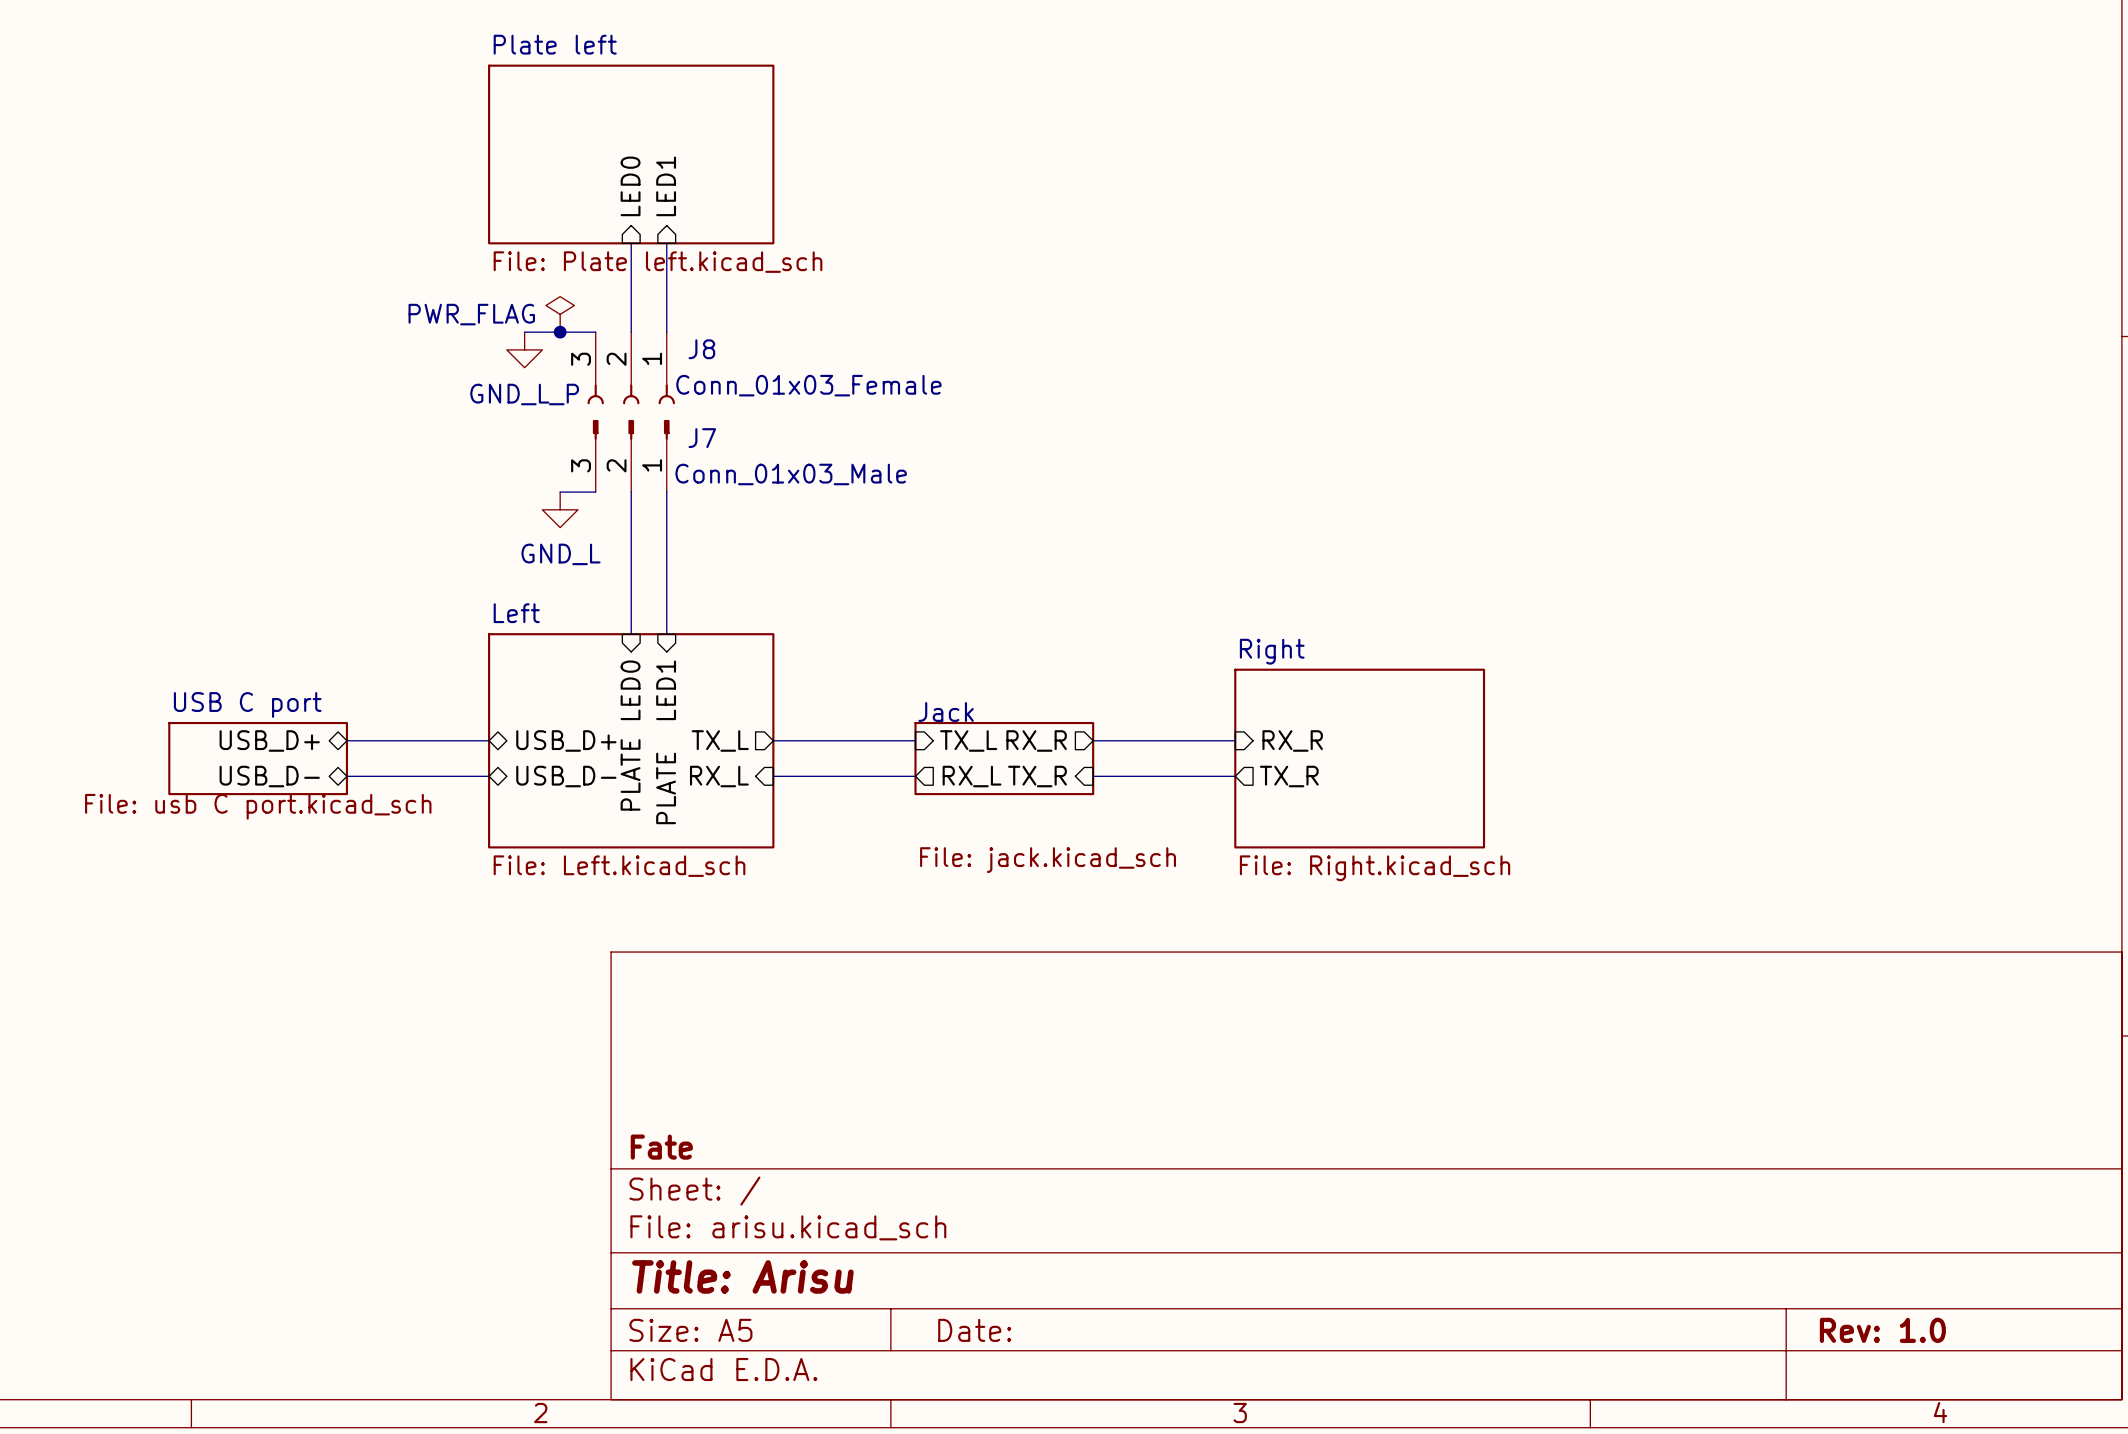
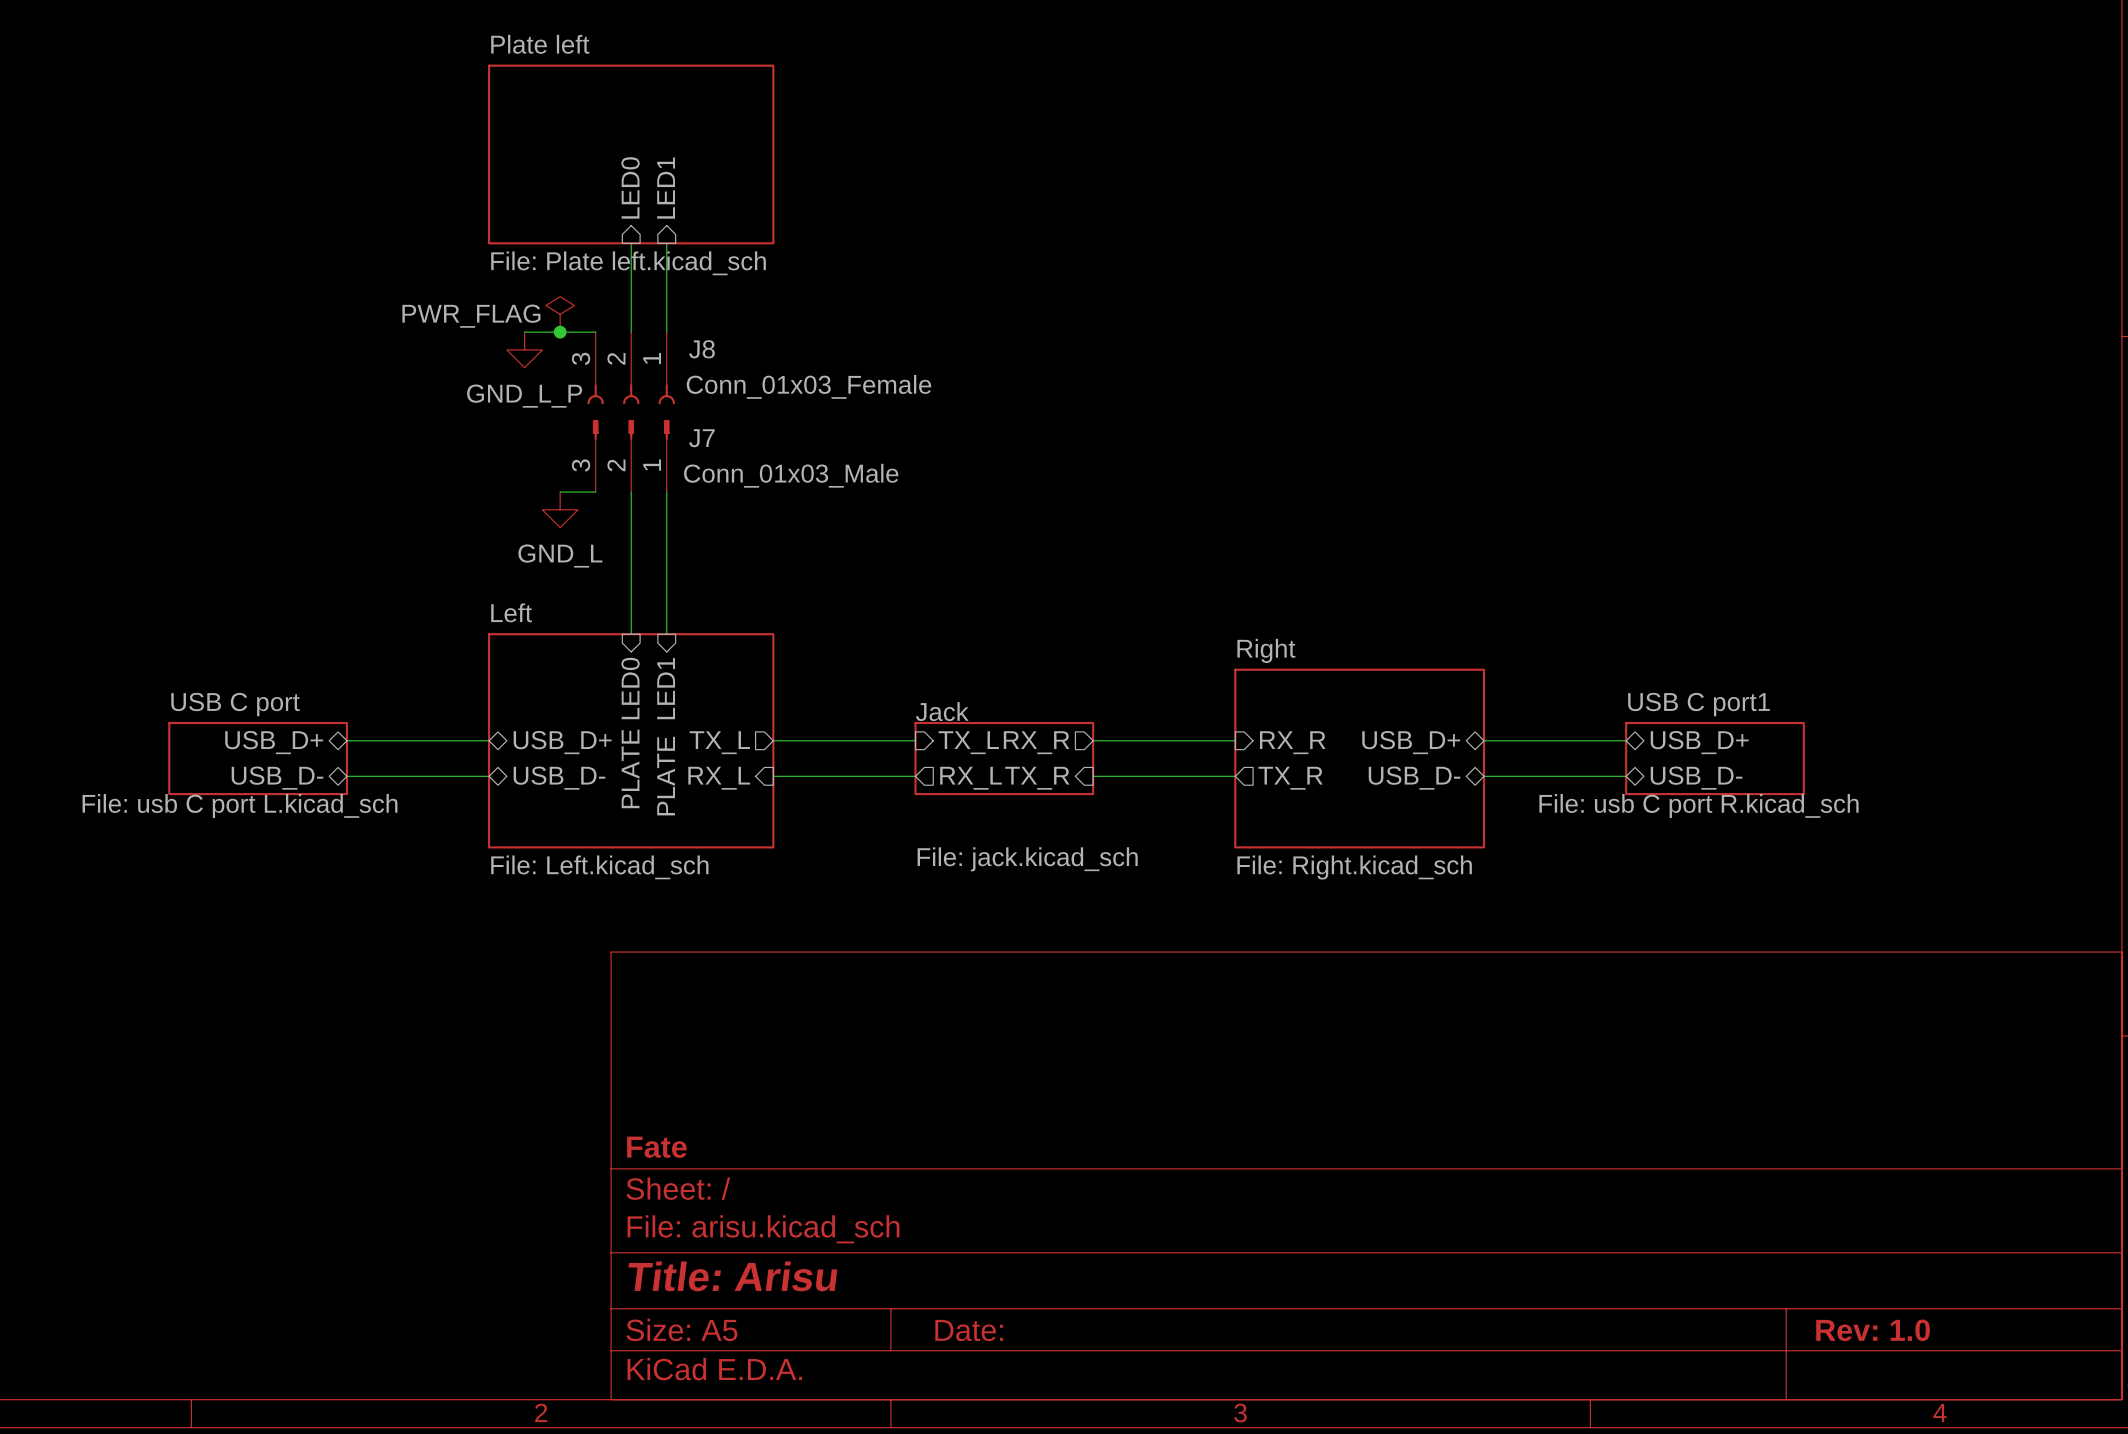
sheet pin: none -> USB_D+ (1411, 742)
wire: none -> (1484, 740) (1626, 740)
sheet pin: none -> USB_D+ (1699, 742)
sheet USB C port1: none -> File: usb C port R.kicad_sch (1714, 758)
sheet pin: none -> USB_D- (1414, 778)
wire: none -> (1484, 776) (1626, 776)
sheet pin: none -> USB_D- (1696, 778)
sheet USB C port value: File: usb C port.kicad_sch (258, 806) -> File: usb C port L.kicad_sch (240, 806)

